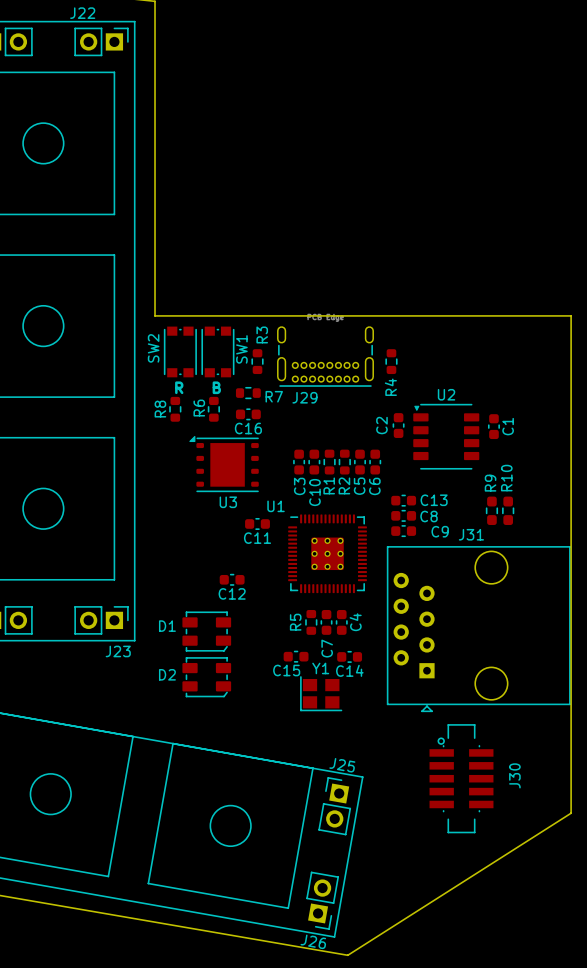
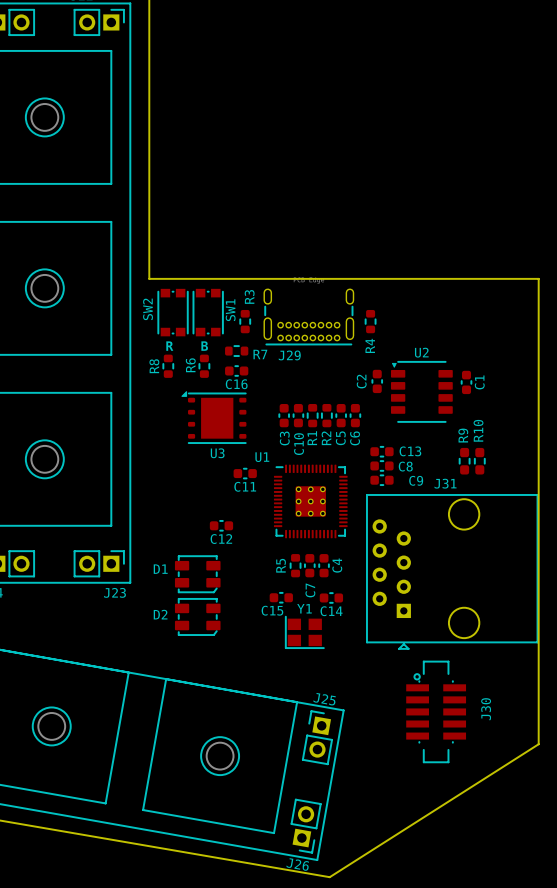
drawing: none -> [30, 103, 59, 132]
drawing: none -> [30, 274, 59, 303]
drawing: none -> [30, 445, 59, 474]
drawing: none -> [37, 712, 66, 741]
drawing: none -> [206, 742, 234, 771]

